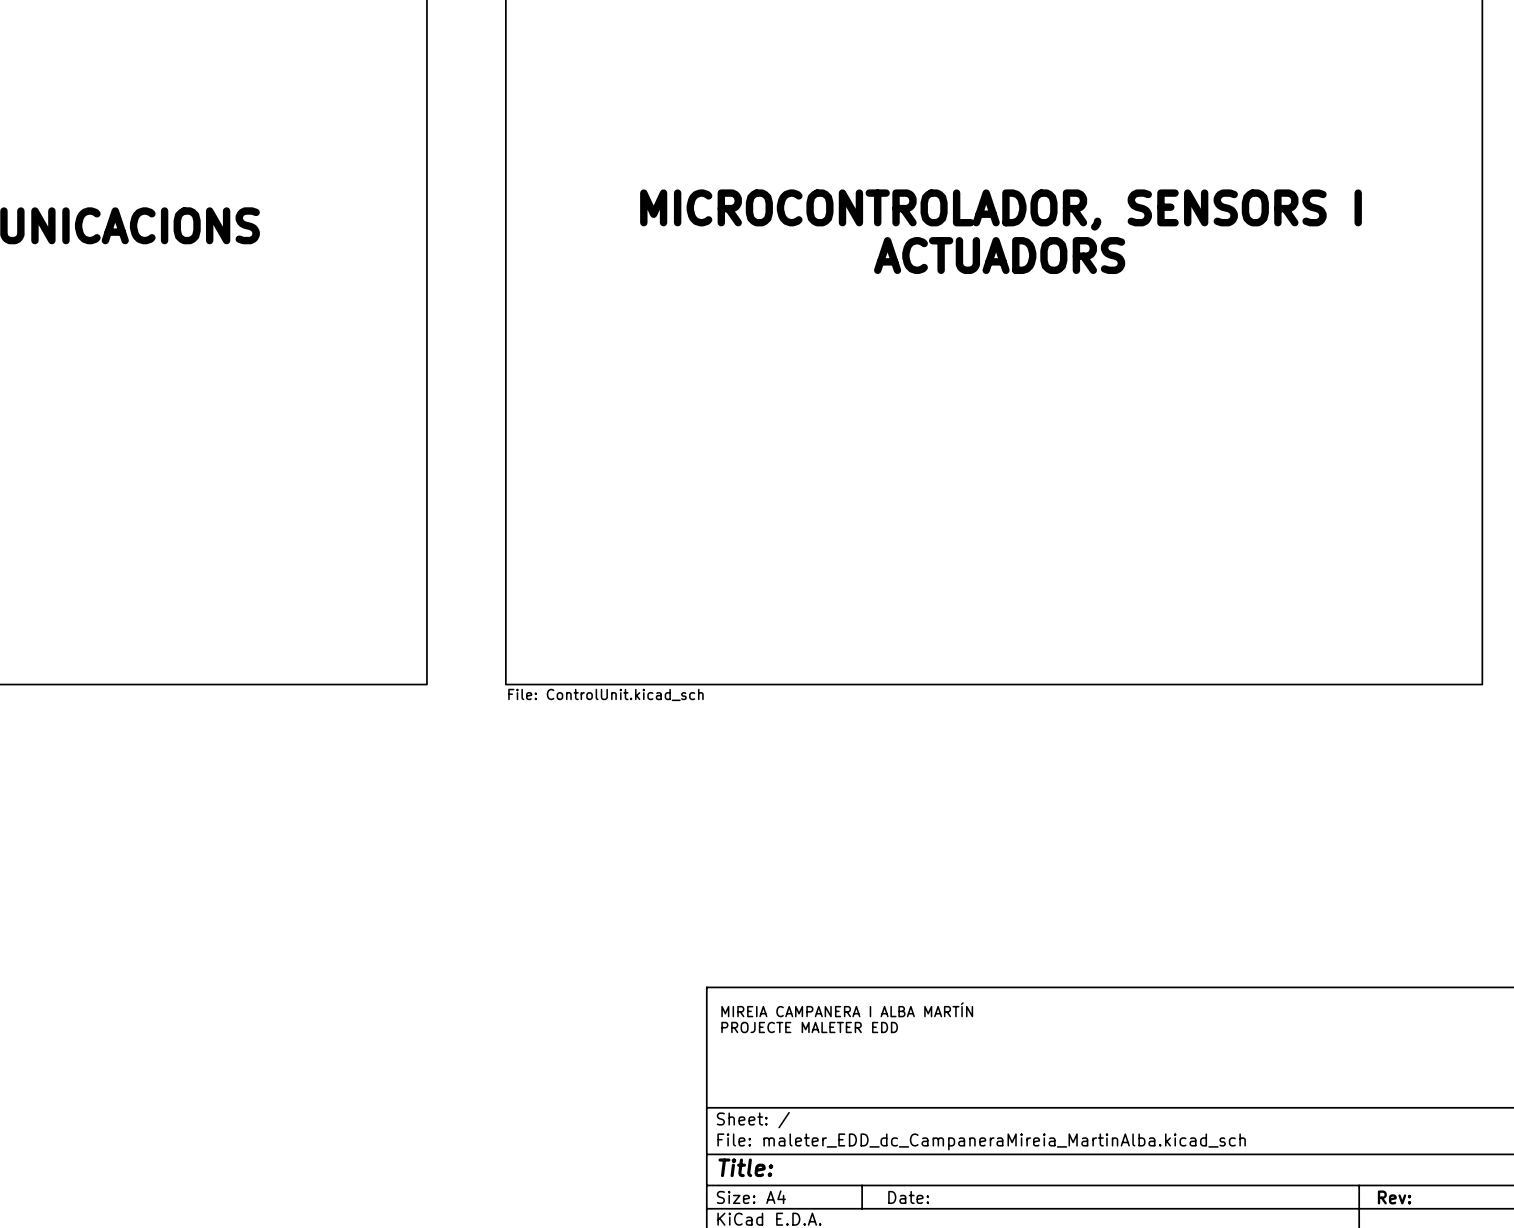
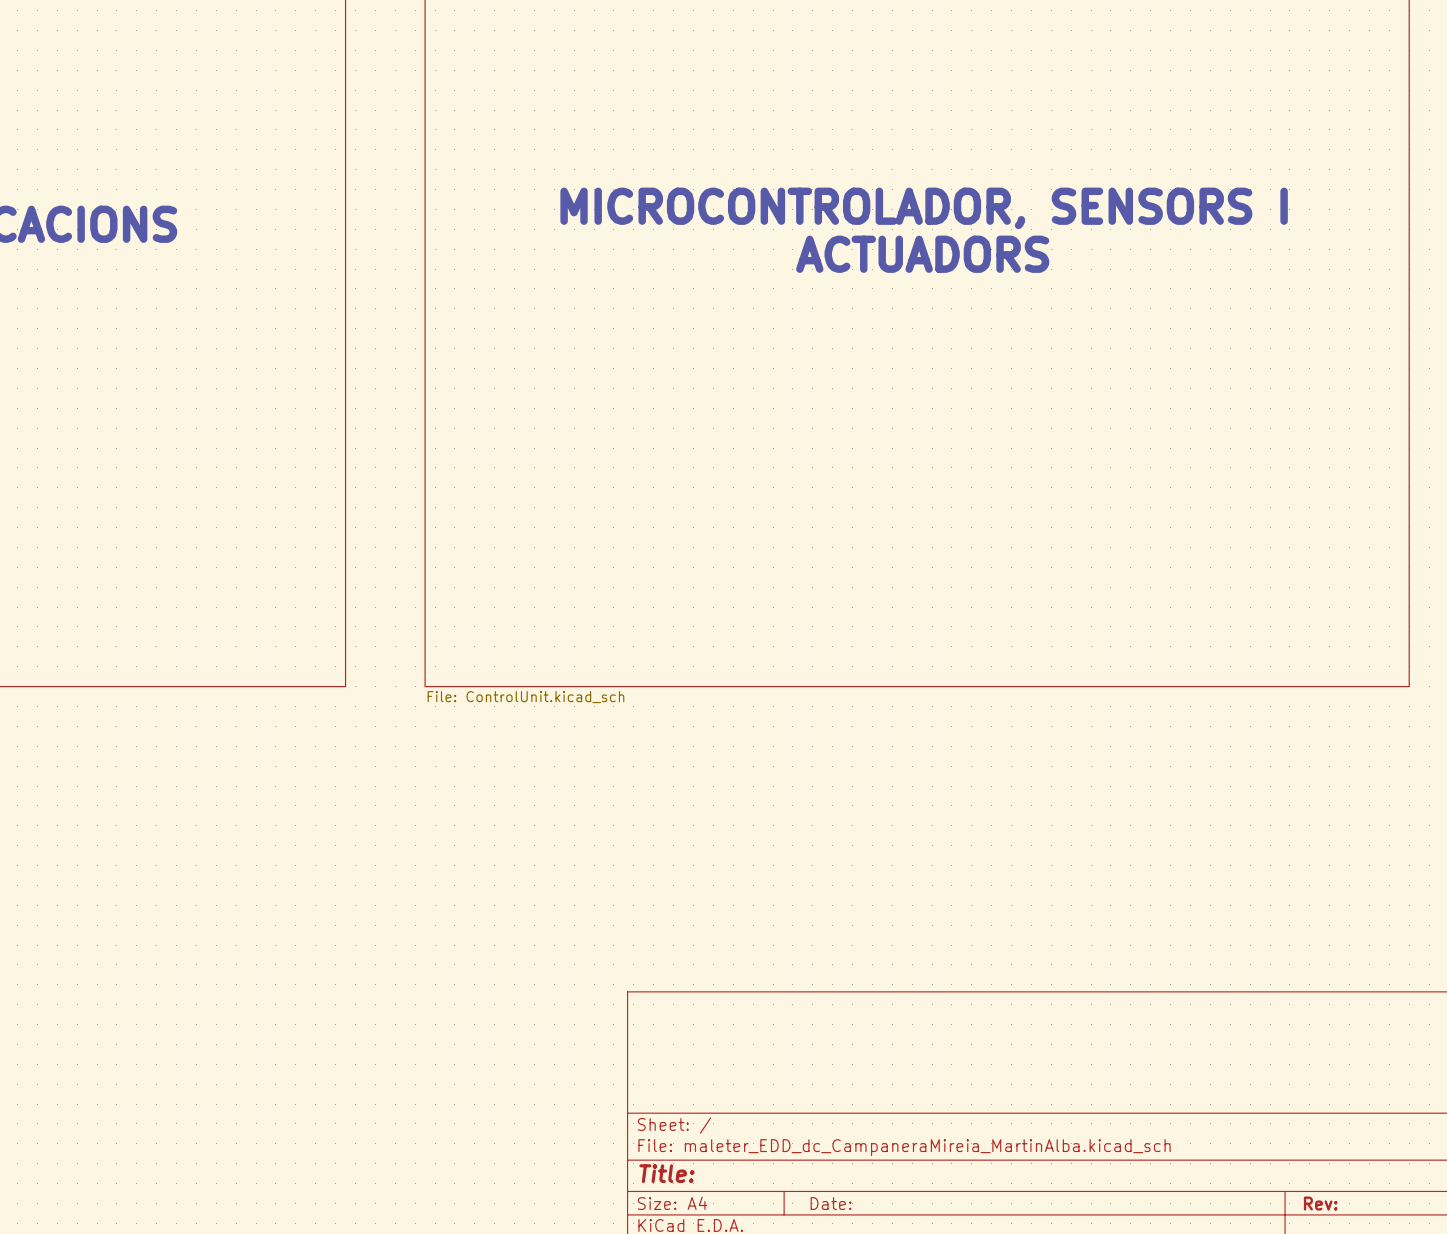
text: MIREIA CAMPANERA I ALBA MARTÍN (847, 1009) -> none
text: PROJECTE MALETER EDD (809, 1027) -> none

